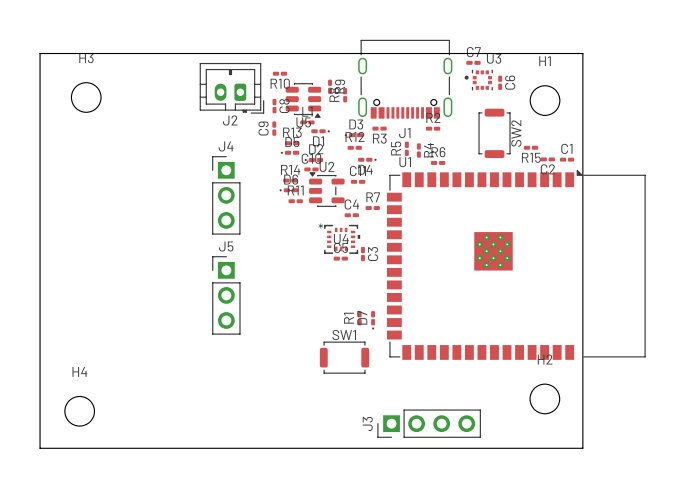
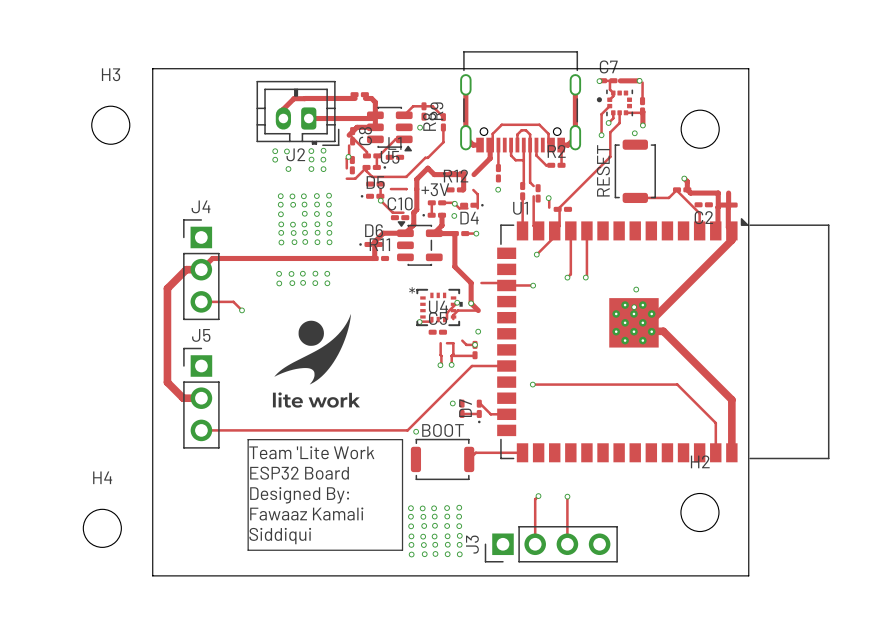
board edge: (118, 53) (40, 53) (40, 448) (118, 448) -> (152, 68) (152, 575)
U3 name: U3 (494, 58) -> none
H1 name: H1 (545, 61) -> none
track: none -> (620, 80) (639, 80)
via: none -> (639, 80)
track: none -> (599, 81) (609, 80) (609, 89) (613, 96) (609, 99)
via: none -> (599, 81)
track: none -> (642, 82) (642, 101)
track: none -> (465, 84) (465, 137) (473, 145) (480, 145)
track: none -> (575, 84) (575, 137) (568, 145) (561, 145) (561, 165)
track: none -> (355, 98) (293, 98) (283, 109) (283, 118)
track: none -> (365, 98) (371, 98) (375, 102) (375, 127) (357, 127) (349, 135) (366, 152) (366, 155)
track: none -> (609, 106) (601, 114) (601, 135)
C6 name: C6 (510, 82) -> none
R10 name: R10 (280, 83) -> none
track: none -> (613, 112) (613, 118) (608, 123)
track: none -> (619, 112) (619, 123) (610, 132) (610, 156) (559, 207) (559, 226) (554, 230) (554, 236) (536, 254)
track: none -> (625, 112) (642, 111) (642, 125)
track: none -> (375, 115) (372, 118) (308, 118)
track: none -> (404, 115) (413, 106) (432, 106) (443, 117)
via: none -> (608, 123)
via: none -> (642, 125)
via: none -> (420, 127)
track: none -> (443, 127) (443, 142) (406, 176) (372, 176) (366, 171) (366, 167) (355, 178) (346, 178)
via: none -> (634, 133)
via: none -> (601, 135)
track: none -> (404, 139) (395, 139) (376, 156) (376, 167)
track: none -> (498, 145) (498, 168)
track: none -> (511, 145) (511, 155) (515, 160) (523, 160)
track: none -> (517, 145) (517, 134) (521, 130) (525, 130) (530, 134) (530, 182) (533, 186)
track: none -> (523, 145) (522, 185)
track: none -> (536, 145) (536, 155) (546, 165) (551, 165)
track: none -> (551, 145) (548, 142) (548, 133) (539, 124) (501, 124) (492, 133) (490, 158) (473, 174)
track: none -> (349, 145) (346, 168)
via: none -> (275, 151)
via: none -> (286, 151)
via: none -> (311, 151)
via: none -> (323, 150)
part: none -> (372, 155)
via: none -> (348, 156)
via: none -> (275, 159)
via: none -> (311, 159)
via: none -> (323, 159)
D3 name: D3 (356, 124) -> none
C9 name: C9 (263, 128) -> none
R3: (379, 128) -> none
part: none -> (374, 167)
via: none -> (288, 169)
via: none -> (311, 169)
via: none -> (323, 169)
D1: (320, 131) -> none
R13 name: R13 (292, 132) -> none
J1 name: J1 (404, 133) -> none
SW2 name: SW2 (516, 133) -> RESET (603, 170)
part: none -> (498, 173)
track: none -> (684, 178) (687, 181) (687, 189) (690, 193) (718, 193) (717, 228) (715, 230)
via: none -> (684, 178)
track: none -> (380, 189) (380, 200) (392, 212) (403, 212)
track: none -> (390, 189) (406, 189)
track: none -> (463, 190) (463, 174) (434, 174) (427, 168) (416, 179) (416, 209) (413, 212) (413, 224) (405, 233) (383, 233) (374, 241) (374, 258) (212, 258) (201, 269) (186, 269) (167, 288) (167, 382) (183, 398) (201, 398)
track: none -> (473, 190) (477, 194) (477, 208)
via: none -> (498, 189)
R5 name: R5 (396, 148) -> none
C1 name: C1 (566, 148) -> none
R4 name: R4 (428, 150) -> none
track: none -> (728, 193) (728, 227) (731, 230) (731, 240) (649, 322) (633, 322)
via: none -> (280, 196)
via: none -> (292, 196)
via: none -> (303, 196)
via: none -> (316, 196)
via: none -> (329, 195)
track: none -> (522, 196) (522, 230)
track: none -> (533, 196) (533, 225) (538, 230)
R6 name: R6 (438, 152) -> none
track: none -> (548, 198) (549, 207)
via: none -> (548, 198)
track: none -> (635, 197) (668, 197) (677, 189) (699, 213) (699, 230)
via: none -> (380, 200)
track: none -> (431, 202) (431, 215)
part: none -> (436, 202)
track: none -> (442, 202) (453, 202) (459, 208) (467, 208)
R15 name: R15 (531, 157) -> none
via: none -> (454, 203)
via: none -> (280, 204)
via: none -> (293, 204)
via: none -> (304, 204)
via: none -> (317, 204)
via: none -> (328, 204)
D2: (313, 160) -> none
via: none -> (280, 214)
via: none -> (304, 213)
via: none -> (316, 213)
via: none -> (329, 214)
U2 name: U2 (327, 166) -> none
+3V: none -> (434, 215)
track: none -> (442, 215) (442, 225) (434, 233) (454, 233) (454, 266) (471, 283) (471, 303) (478, 310) (458, 310) (453, 315) (453, 319)
via: none -> (454, 215)
C11 name: C11 (357, 171) -> none
via: none -> (281, 224)
via: none -> (292, 224)
via: none -> (304, 224)
via: none -> (317, 224)
via: none -> (329, 223)
track: none -> (570, 230) (570, 274) (567, 277)
track: none -> (586, 230) (585, 277)
R14: (290, 180) -> none
via: none -> (281, 232)
via: none -> (293, 233)
via: none -> (305, 232)
via: none -> (317, 232)
via: none -> (329, 232)
track: none -> (465, 233) (476, 233)
via: none -> (476, 233)
via: none -> (281, 242)
via: none -> (294, 242)
via: none -> (305, 241)
via: none -> (317, 242)
via: none -> (329, 242)
J4 position: (226, 195) -> (201, 269)
via: none -> (536, 254)
R7: (372, 208) -> none
via: none -> (279, 273)
via: none -> (291, 273)
via: none -> (302, 273)
via: none -> (315, 273)
via: none -> (327, 273)
C4: (351, 215) -> none
via: none -> (567, 277)
via: none -> (585, 277)
via: none -> (279, 283)
via: none -> (292, 283)
via: none -> (303, 282)
via: none -> (315, 283)
via: none -> (327, 283)
track: none -> (481, 283) (533, 285)
via: none -> (533, 285)
via: none -> (636, 289)
track: none -> (201, 301) (233, 301) (242, 310)
track: none -> (457, 302) (447, 312) (447, 319)
via: none -> (457, 302)
via: none -> (471, 303)
via: none -> (634, 307)
via: none -> (242, 310)
drawing: none -> [272, 314, 361, 408]
via: none -> (419, 322)
track: none -> (431, 321) (419, 322)
track: none -> (633, 322) (642, 331) (663, 331) (731, 399) (731, 452)
C3: (362, 254) -> none
via: none -> (478, 331)
track: none -> (462, 340) (466, 344) (475, 344)
track: none -> (440, 343) (440, 365)
track: none -> (447, 343) (453, 343) (451, 355)
via: none -> (475, 344)
part: none -> (475, 350)
track: none -> (475, 355) (451, 355)
track: none -> (451, 355) (451, 364)
via: none -> (440, 365)
via: none -> (451, 364)
track: none -> (506, 366) (471, 366) (407, 430) (201, 430)
J5 position: (226, 295) -> (201, 398)
track: none -> (532, 384) (677, 384) (715, 423) (715, 452)
via: none -> (532, 384)
via: none -> (452, 403)
track: none -> (479, 403) (490, 414) (506, 414)
R1 name: R1 (348, 318) -> none
track: none -> (462, 413) (479, 413)
SW1 name: SW1 (344, 335) -> BOOT (443, 430)
via: none -> (416, 431)
line: none -> (248, 439) (402, 439) (402, 550) (248, 550) (248, 439)
text: none -> Team 'Lite Work (311, 452)
track: none -> (522, 452) (475, 452) (469, 459)
text: none -> ESP32 Board (299, 473)
text: none -> Designed By: (299, 495)
track: none -> (538, 496) (535, 499) (535, 544)
via: none -> (538, 496)
track: none -> (567, 496) (567, 544)
via: none -> (567, 496)
via: none -> (410, 508)
via: none -> (422, 508)
via: none -> (434, 508)
via: none -> (447, 508)
via: none -> (459, 507)
text: none -> Fawaaz Kamali (306, 513)
via: none -> (410, 516)
via: none -> (423, 516)
via: none -> (434, 516)
via: none -> (447, 516)
via: none -> (459, 516)
via: none -> (411, 526)
via: none -> (424, 526)
via: none -> (434, 525)
via: none -> (447, 526)
via: none -> (459, 526)
text: none -> Siddiqui (280, 536)
via: none -> (411, 536)
via: none -> (423, 536)
via: none -> (434, 536)
via: none -> (447, 536)
via: none -> (459, 535)
via: none -> (411, 544)
via: none -> (423, 545)
via: none -> (435, 544)
via: none -> (447, 544)
via: none -> (459, 544)
via: none -> (411, 554)
via: none -> (424, 554)
via: none -> (435, 553)
via: none -> (447, 554)
via: none -> (459, 554)

